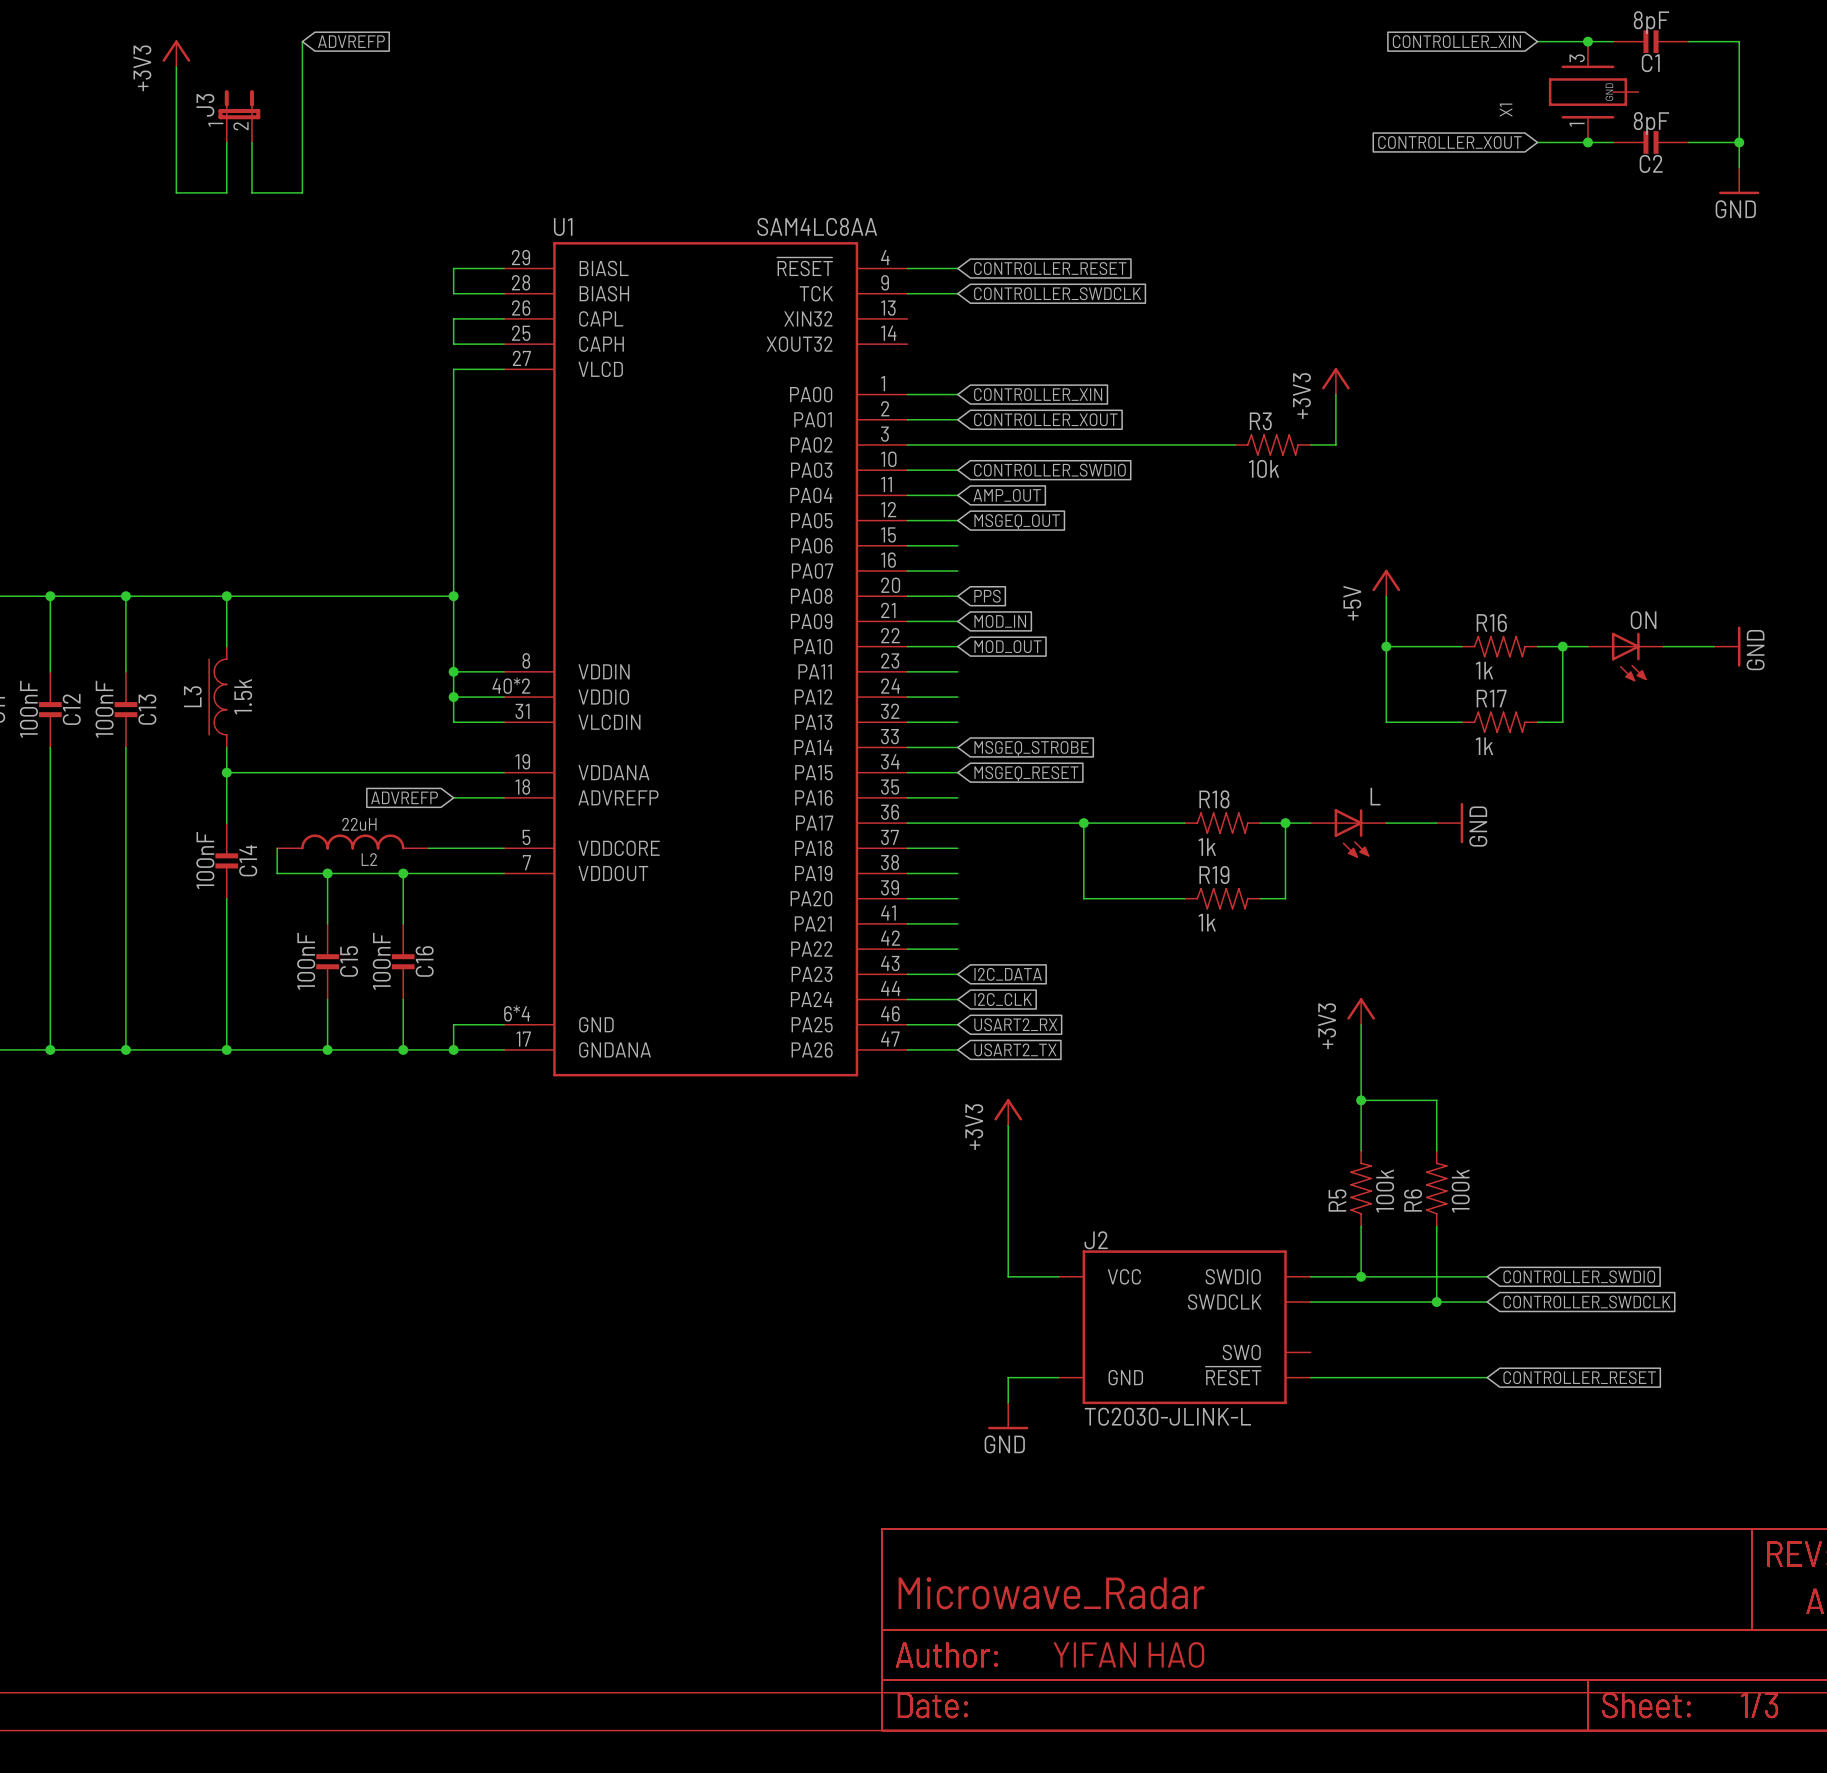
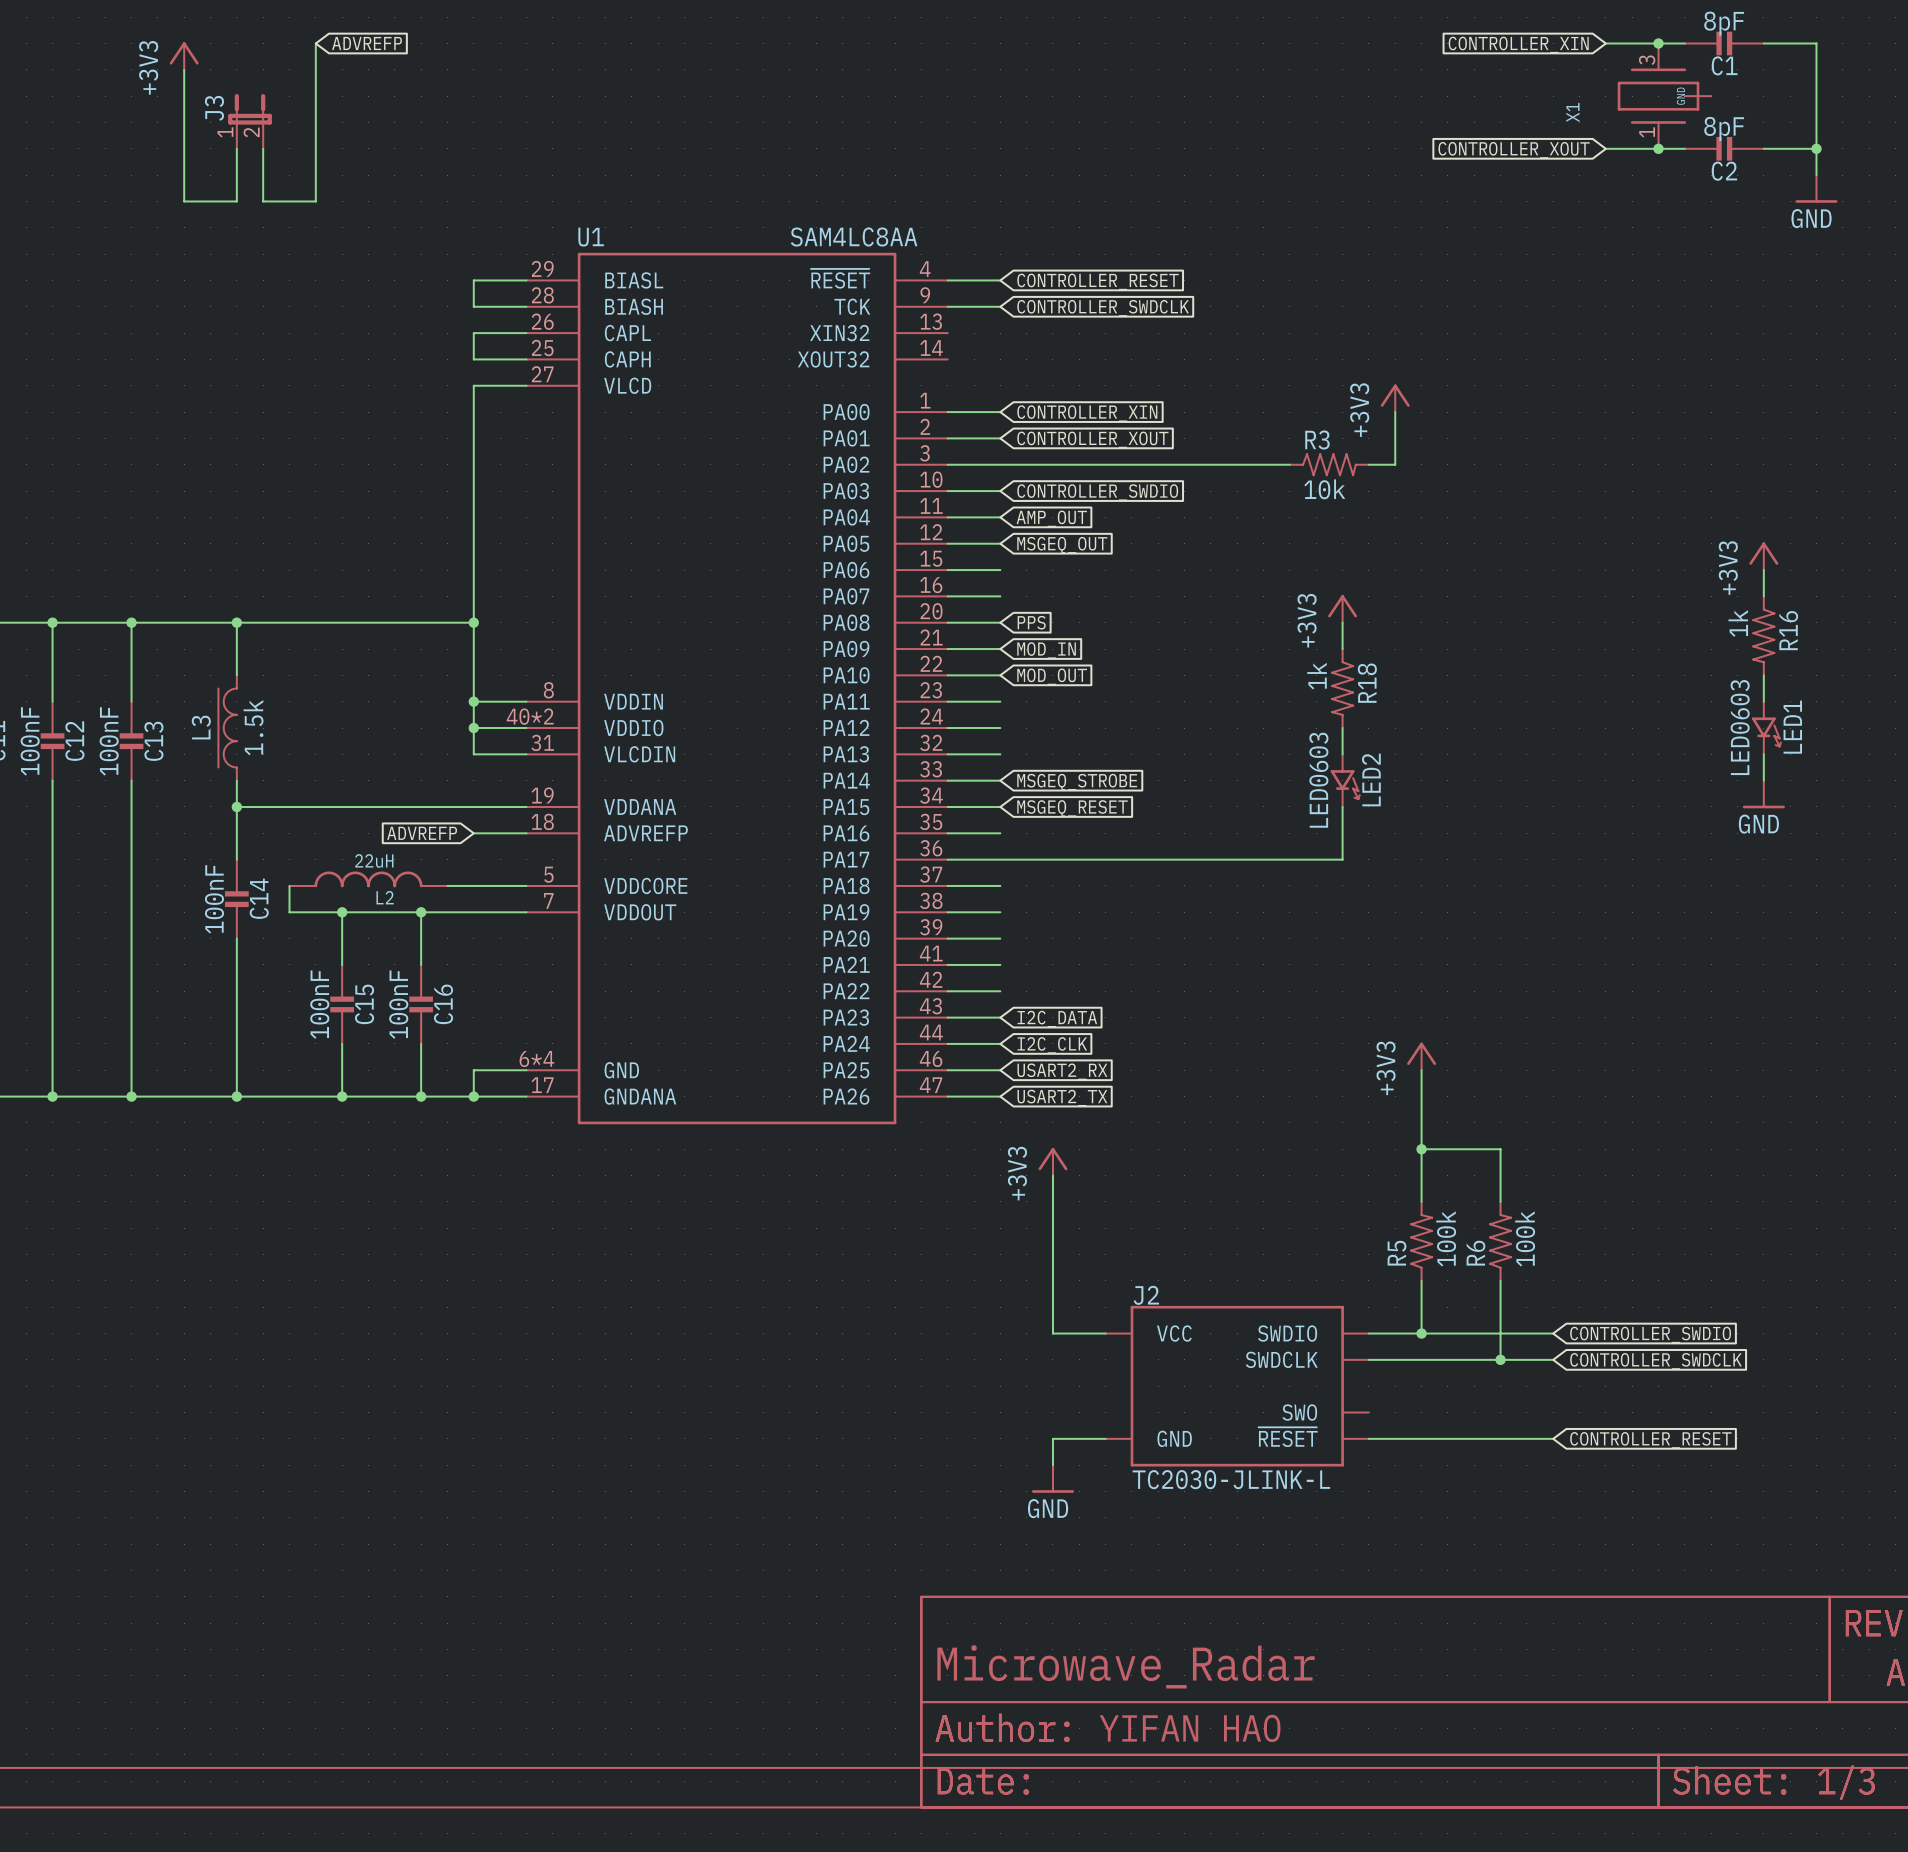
power symbol: none -> +3V3 (1763, 556)
wire: none -> (1763, 570) (1763, 596)
power symbol: none -> +3V3 (1342, 608)
power symbol: +5V (1386, 582) -> none
wire: none -> (1342, 622) (1342, 649)
wire: (1386, 596) (1386, 722) (1461, 722) -> none
wire: (1386, 646) (1461, 646) -> none
junction: (1386, 646) -> none
R16 rotation: 0° (1499, 646) -> 90° clockwise (1763, 635)
R16 position: (1499, 646) -> (1763, 635)
wire: (1537, 646) (1587, 646) -> none
wire: (1562, 646) (1562, 722) (1537, 722) -> none
junction: (1562, 646) -> none
wire: (1663, 646) (1714, 646) -> none
wire: none -> (1763, 675) (1763, 701)
power symbol position: GND (1727, 646) -> GND (1763, 794)
power symbol rotation: 0° (1739, 646) -> 90° clockwise (1763, 806)
ON: (1625, 657) -> none
wire: none -> (1342, 728) (1342, 754)
LED1: none -> LED0603 (1766, 728)
R17: 1k (1499, 722) -> none
wire: none -> (1763, 754) (1763, 780)
LED2: none -> LED0603 (1345, 780)
wire: none -> (1342, 806) (1342, 859)
wire: (1083, 823) (1083, 898) (1184, 898) -> none
junction: (1083, 823) -> none
R18 rotation: 0° (1222, 823) -> 90° clockwise (1342, 688)
R18 position: (1222, 823) -> (1342, 688)
junction: (1285, 823) -> none
wire: (1310, 823) (1285, 823) (1285, 898) (1260, 898) -> none
wire: (1386, 823) (1436, 823) -> none
power symbol: GND (1449, 823) -> none
L: (1348, 833) -> none
R19: 1k (1222, 898) -> none

